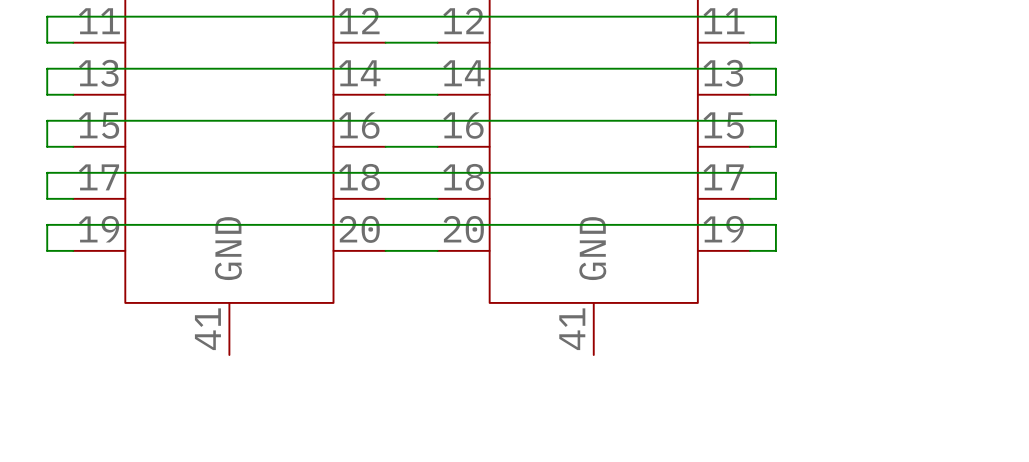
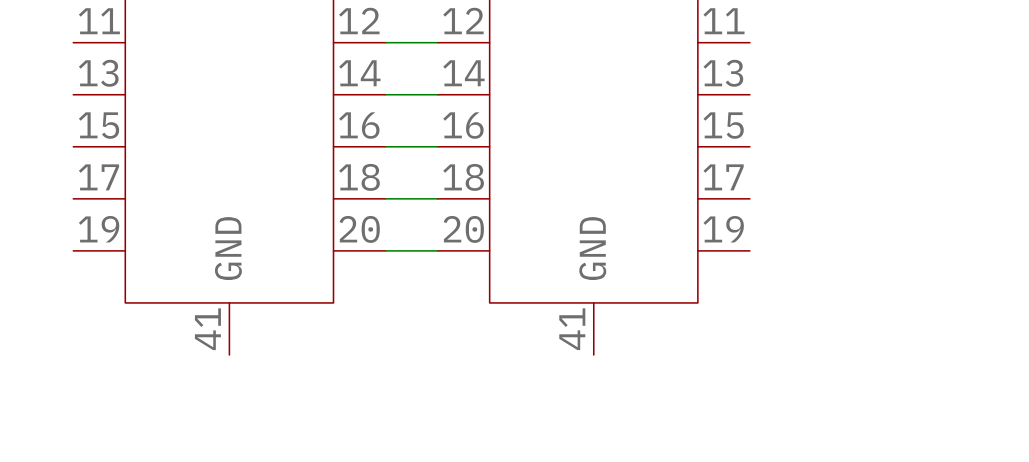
wire: (73, 42) (47, 42) (47, 16) (775, 16) (775, 42) (749, 42) -> none
wire: (73, 94) (47, 94) (47, 68) (775, 68) (775, 94) (749, 94) -> none
wire: (73, 146) (47, 146) (47, 120) (775, 120) (775, 146) (749, 146) -> none
wire: (73, 198) (47, 198) (47, 172) (775, 172) (775, 198) (749, 198) -> none
wire: (73, 250) (47, 250) (47, 224) (775, 224) (775, 250) (749, 250) -> none

